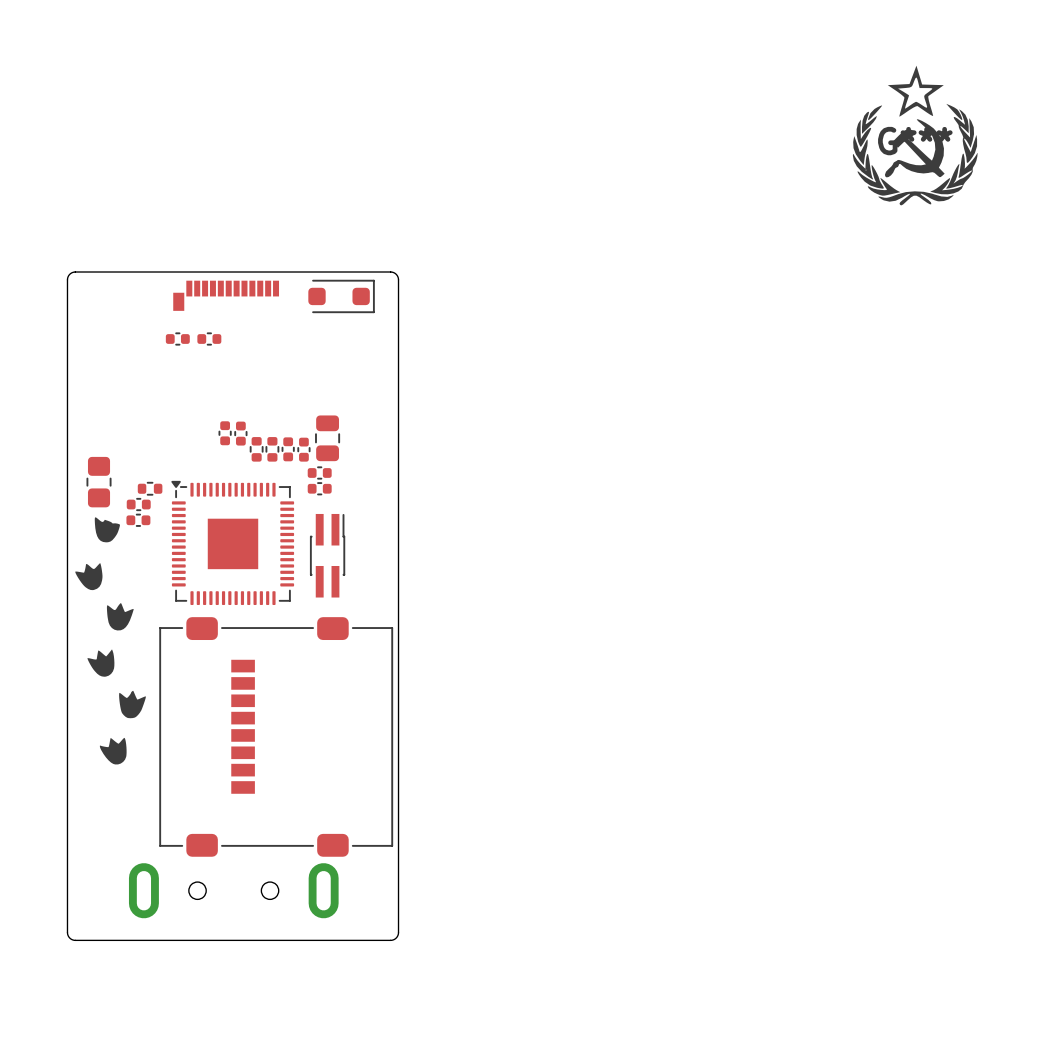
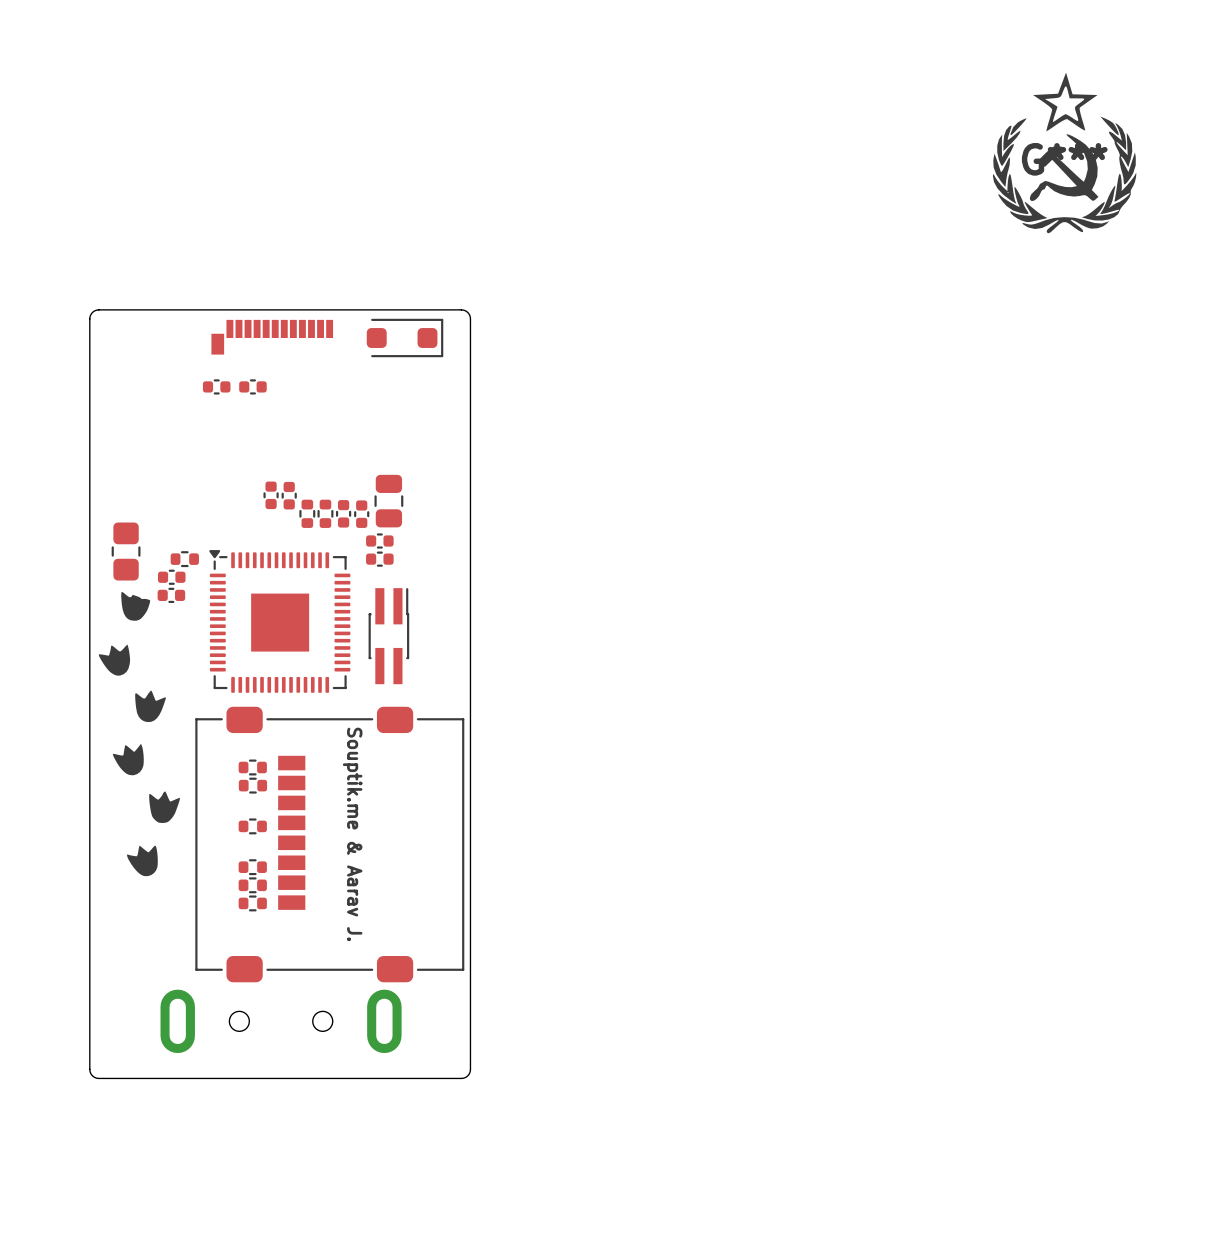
part: none -> (252, 767)
part: none -> (252, 785)
part: none -> (252, 826)
text: none -> Souptik.me & Aarav J. (352, 834)
part: none -> (252, 867)
part: none -> (252, 885)
part: none -> (252, 903)

